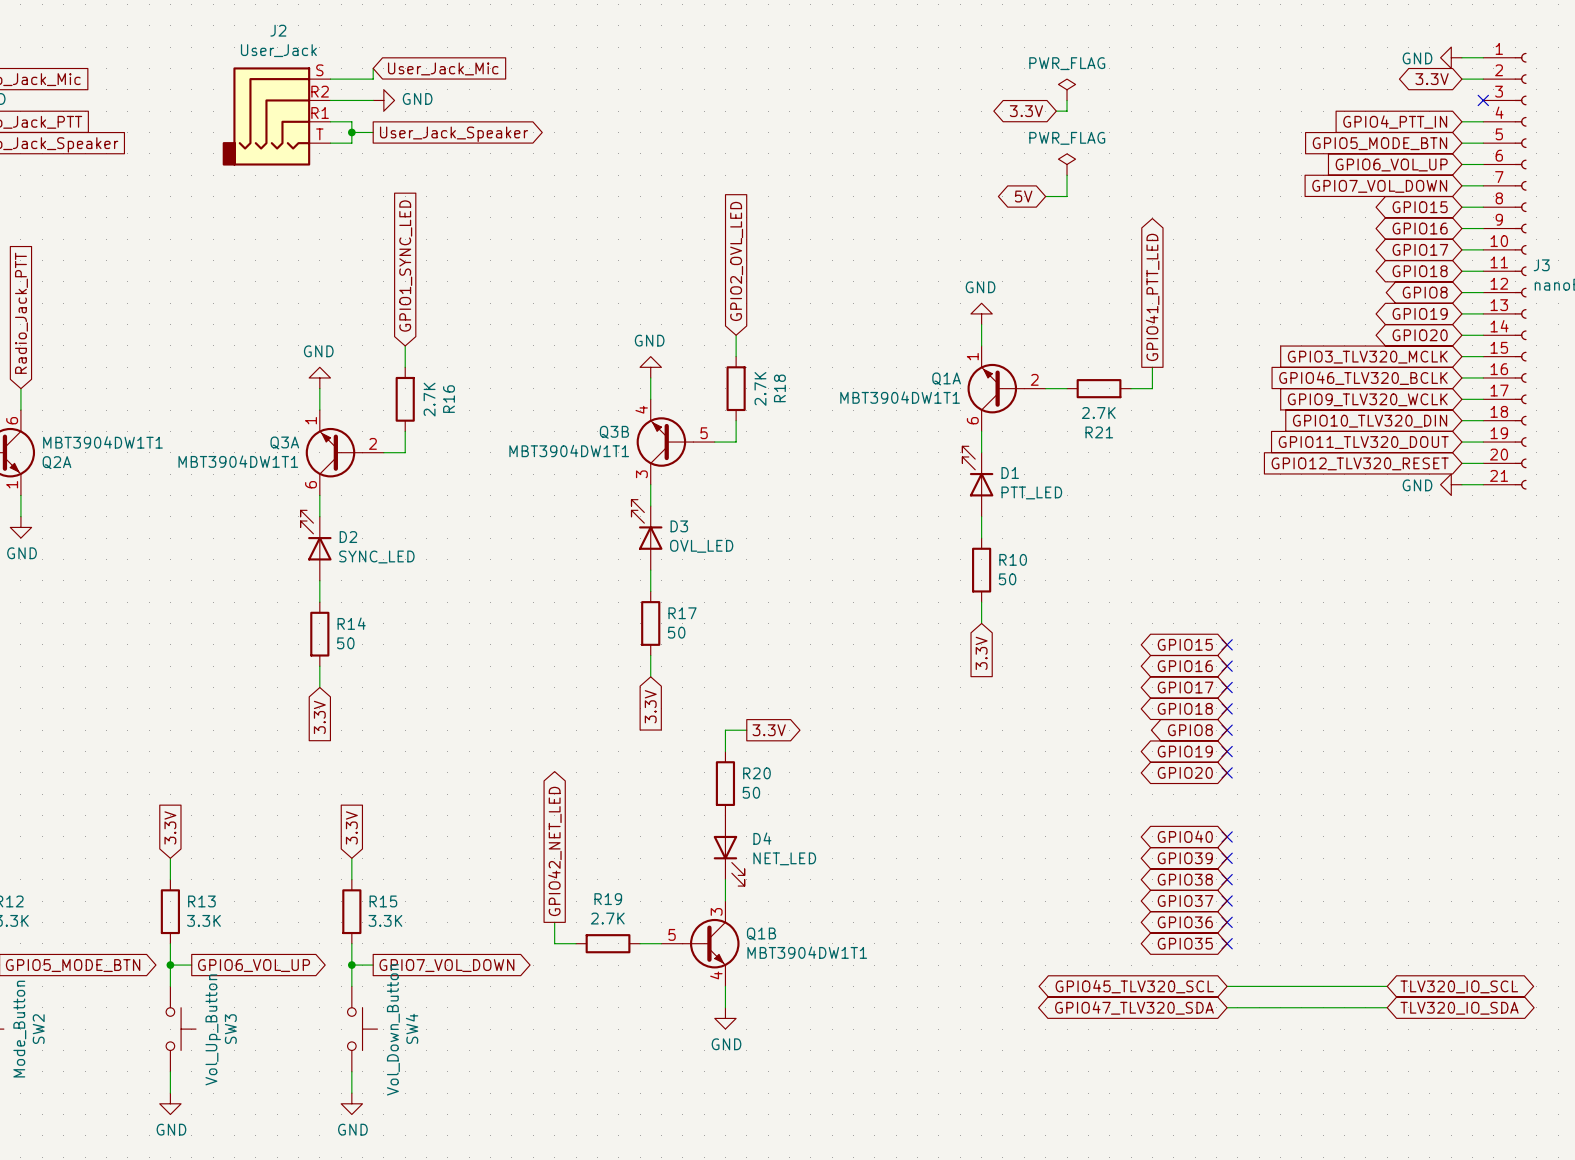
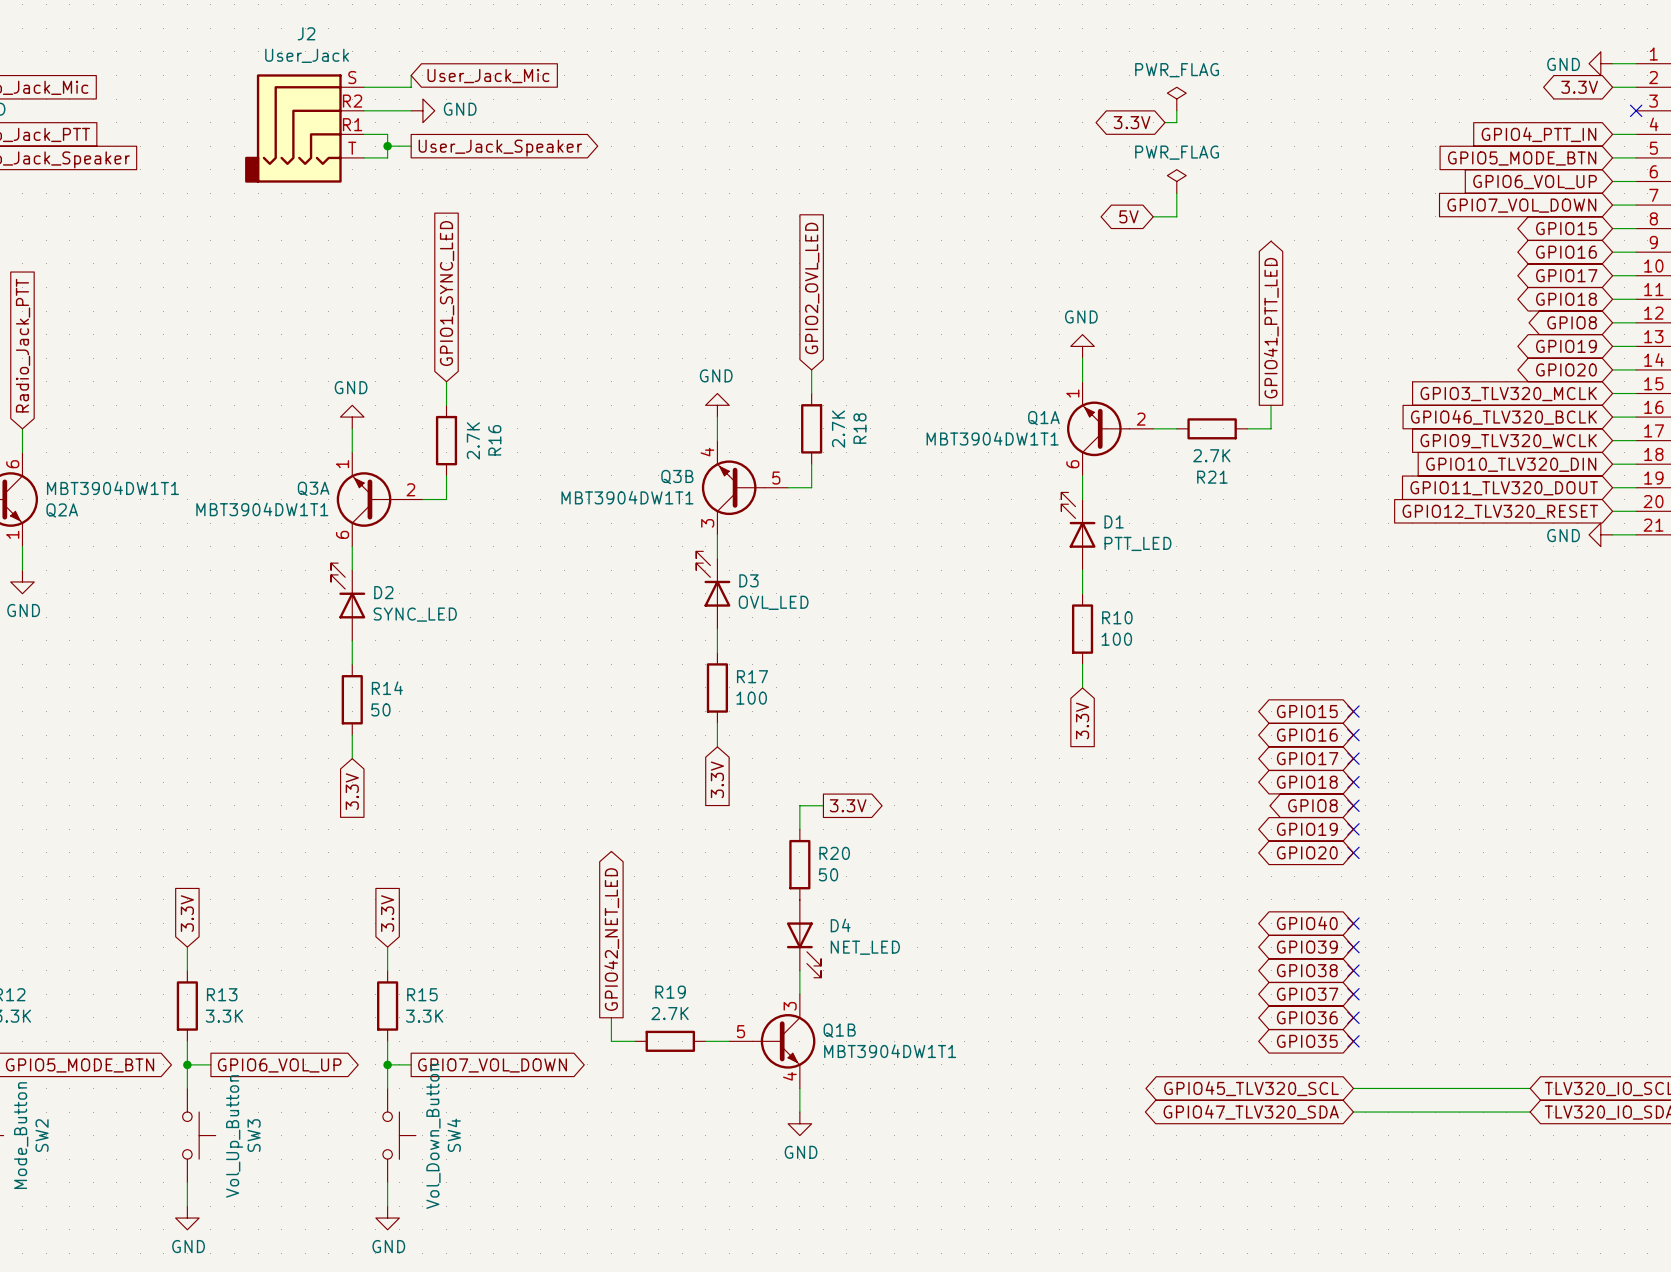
R10 value: 50 (1007, 579) -> 100 (1116, 639)
R17 value: 50 (676, 632) -> 100 (751, 698)

